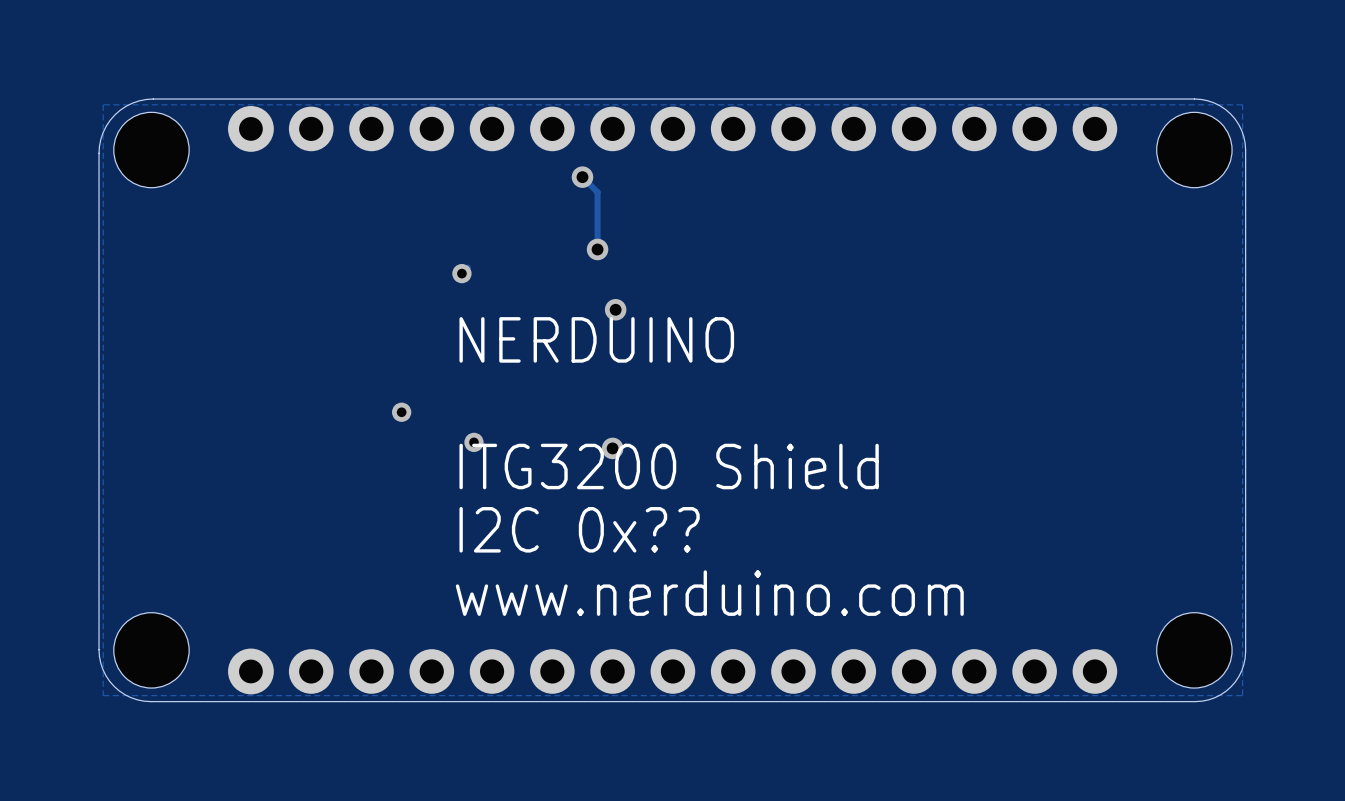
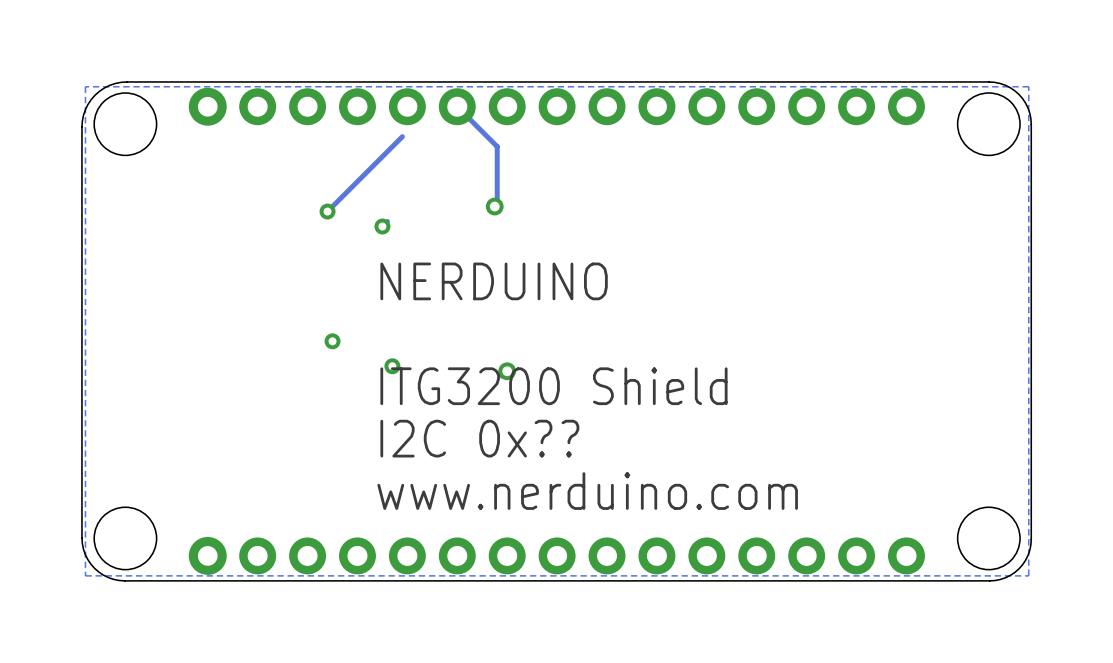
track: none -> (457, 106) (497, 146) (497, 206)
track: none -> (402, 136) (327, 211)
track: (582, 177) (597, 192) (597, 249) -> none
via: (582, 177) -> none
via: none -> (327, 211)
via: (615, 309) -> none

